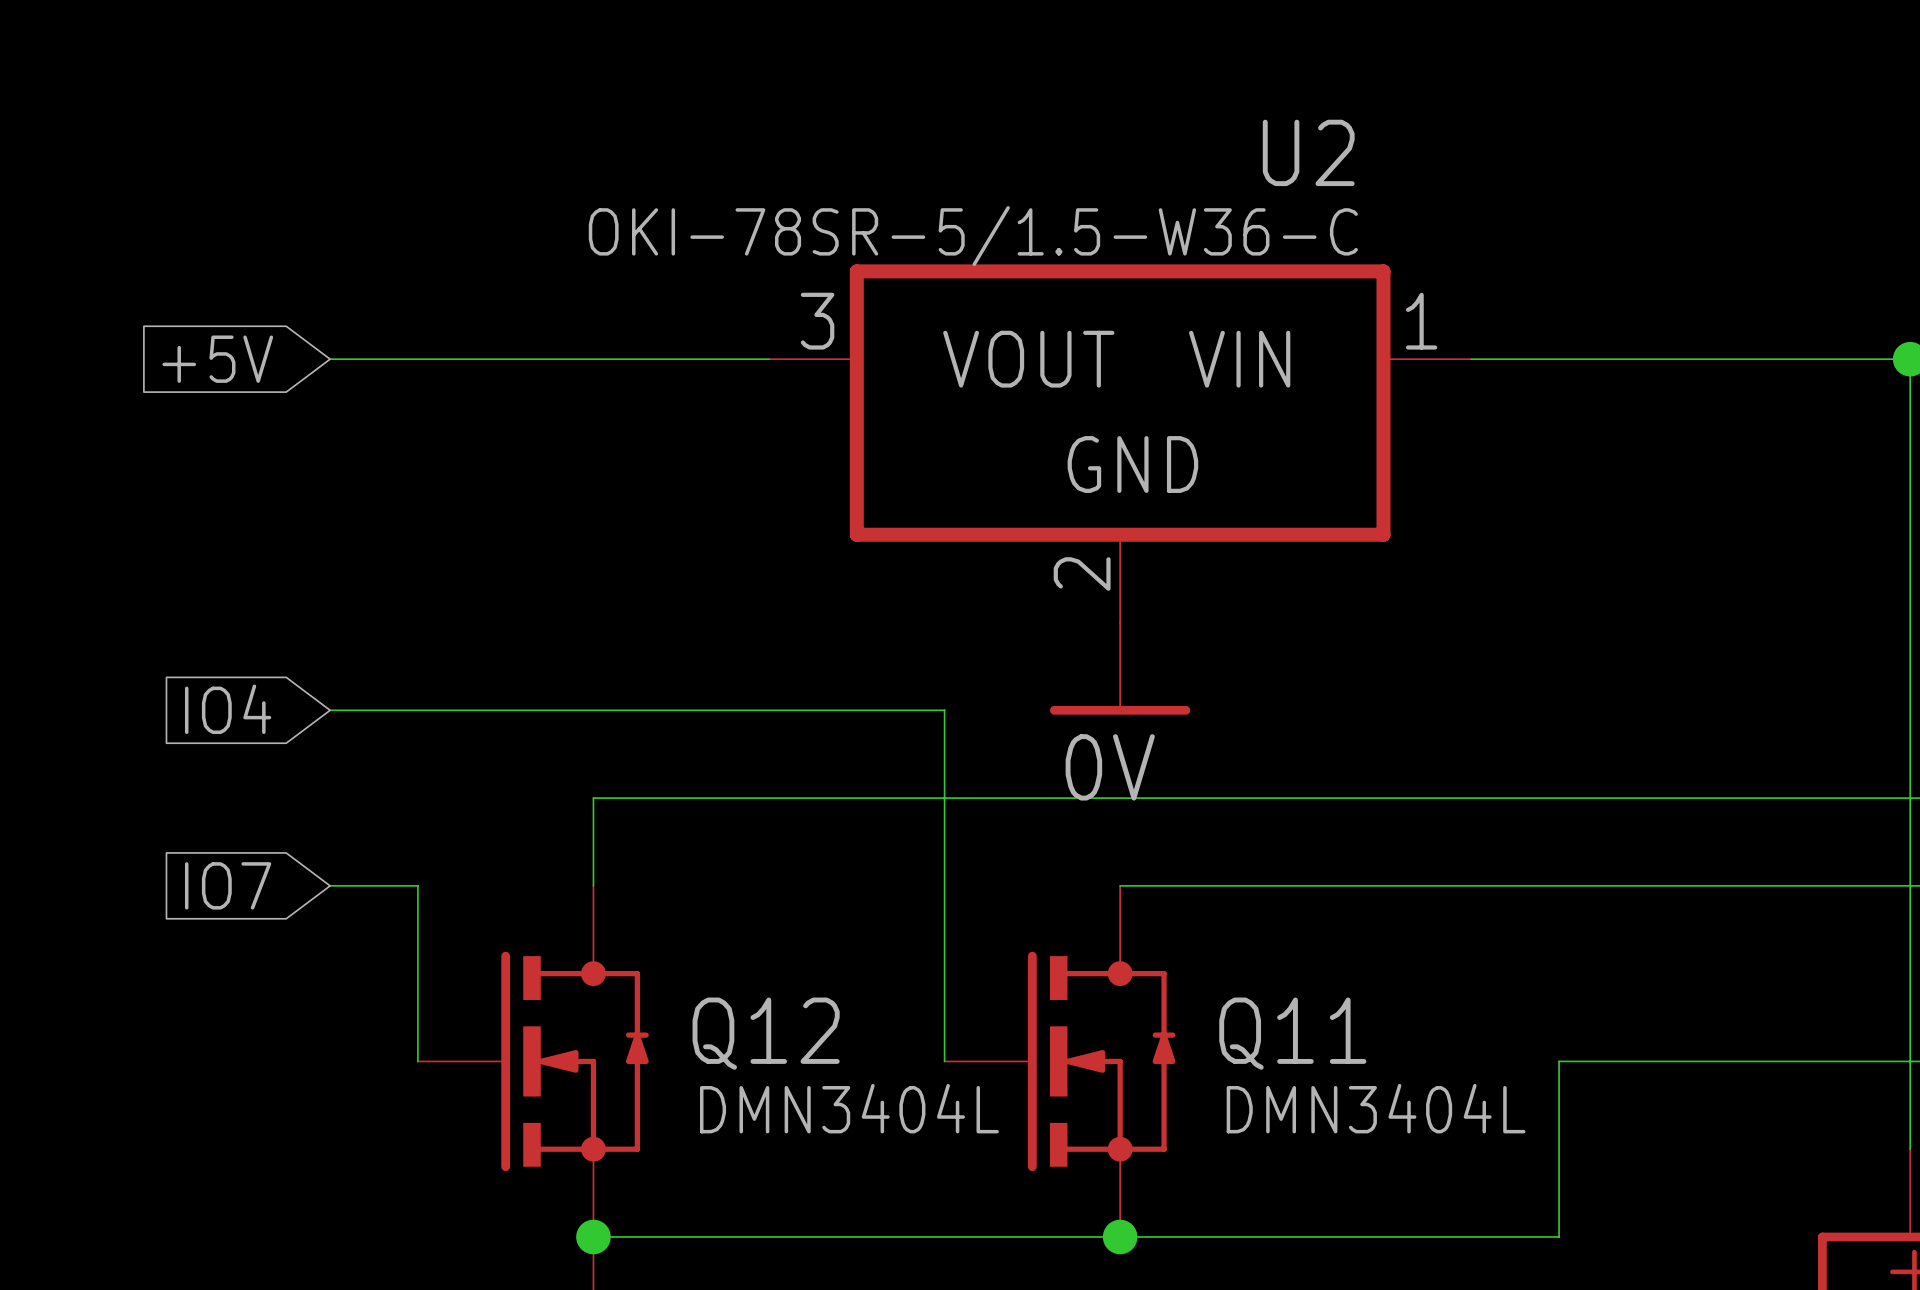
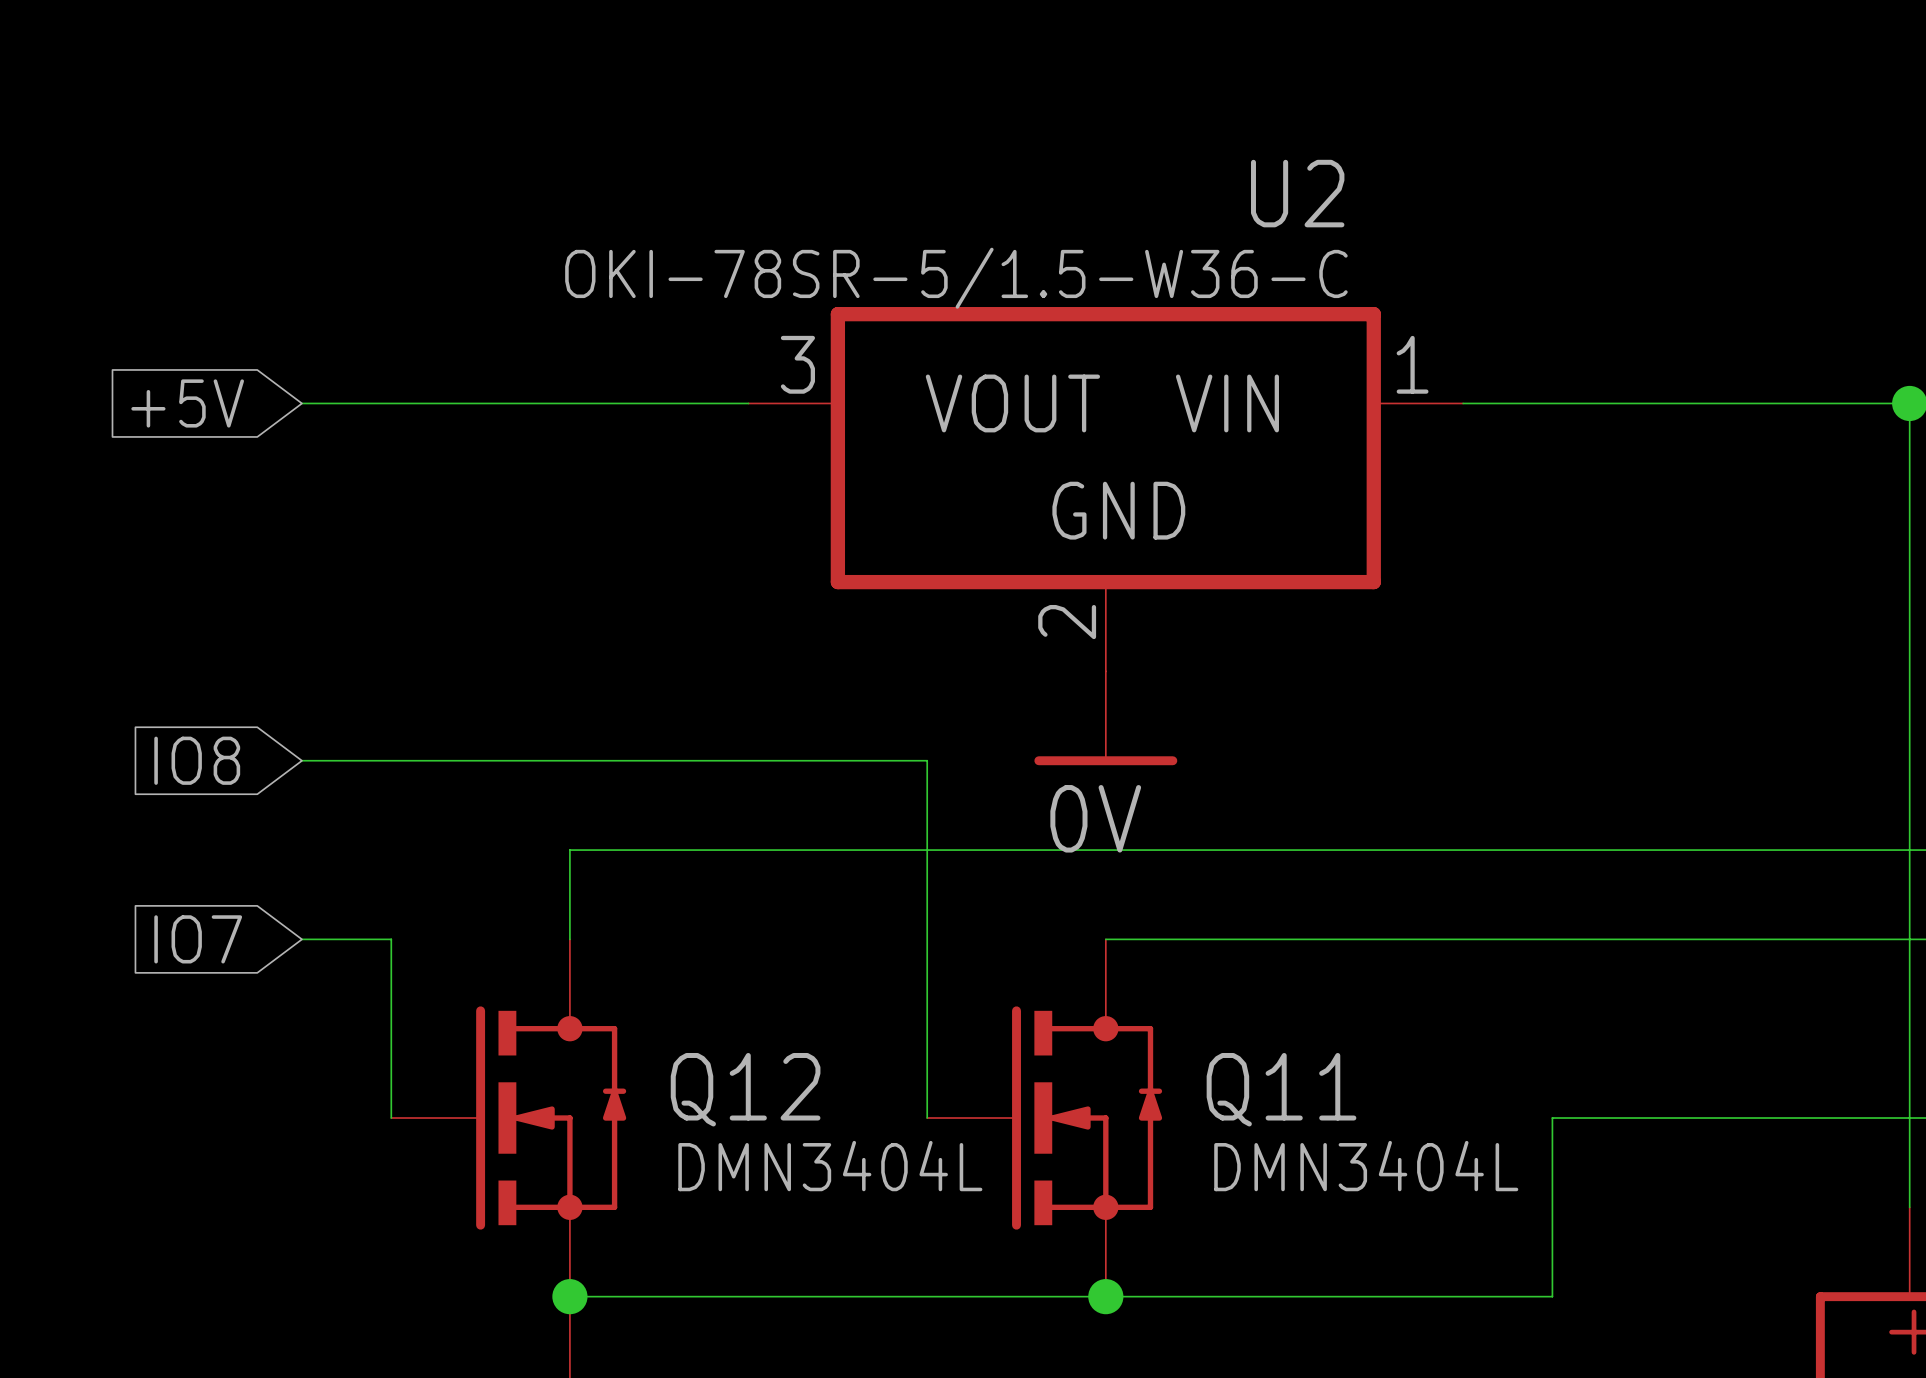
global label: IO4 (228, 709) -> IO8 (197, 760)

